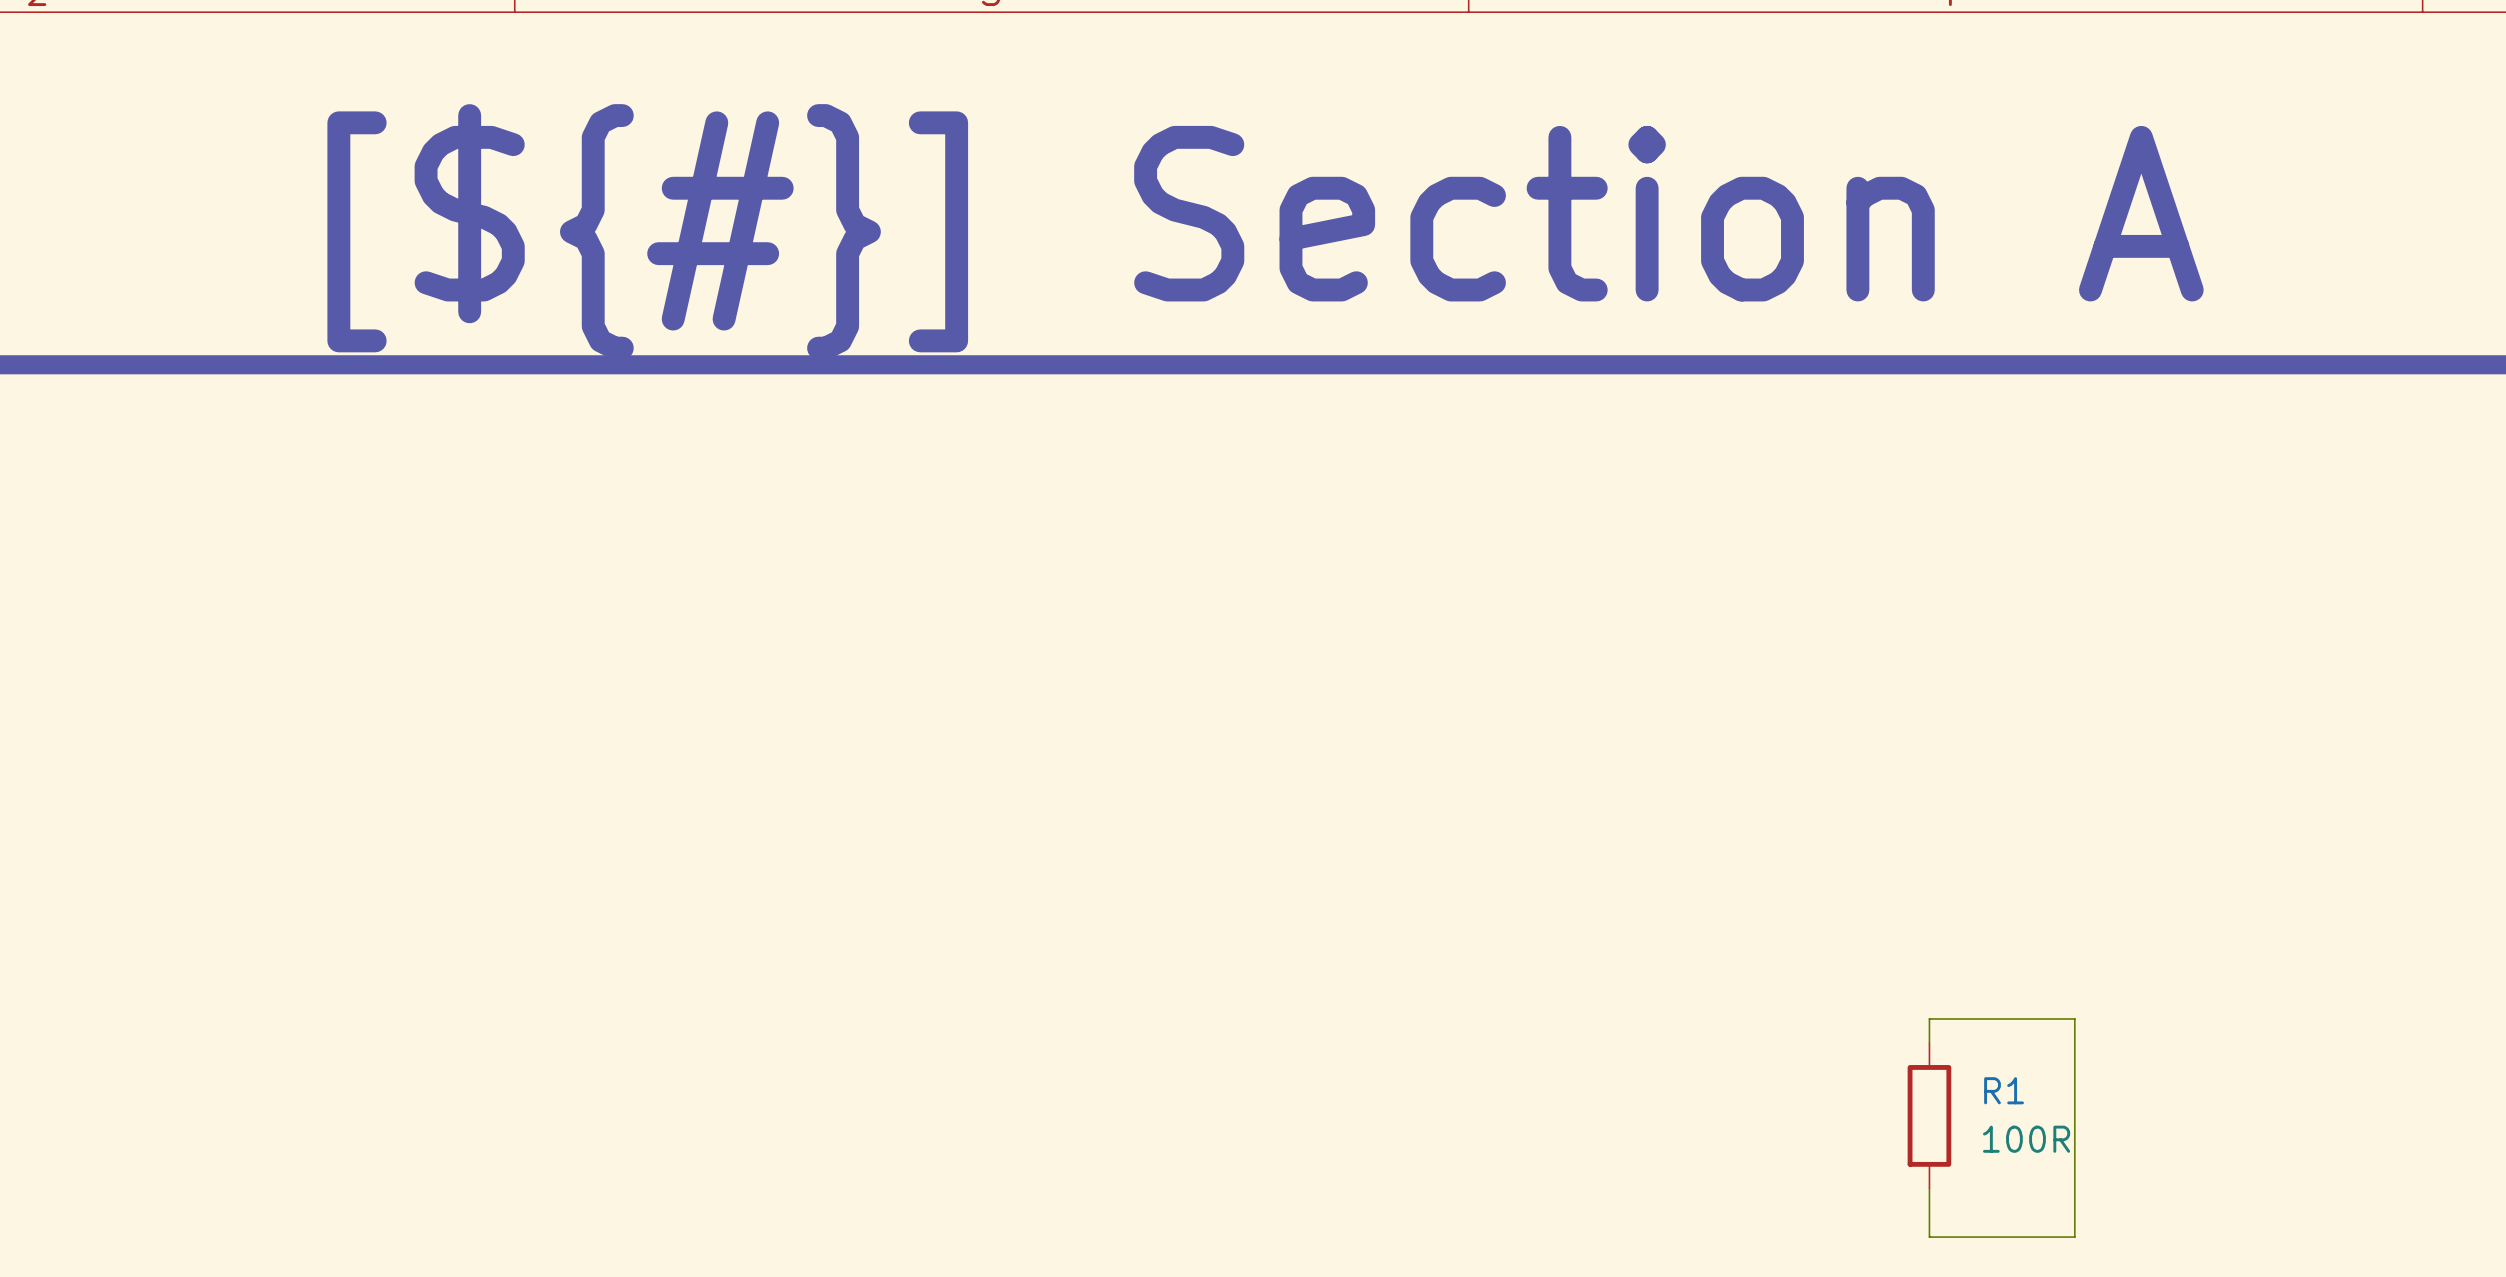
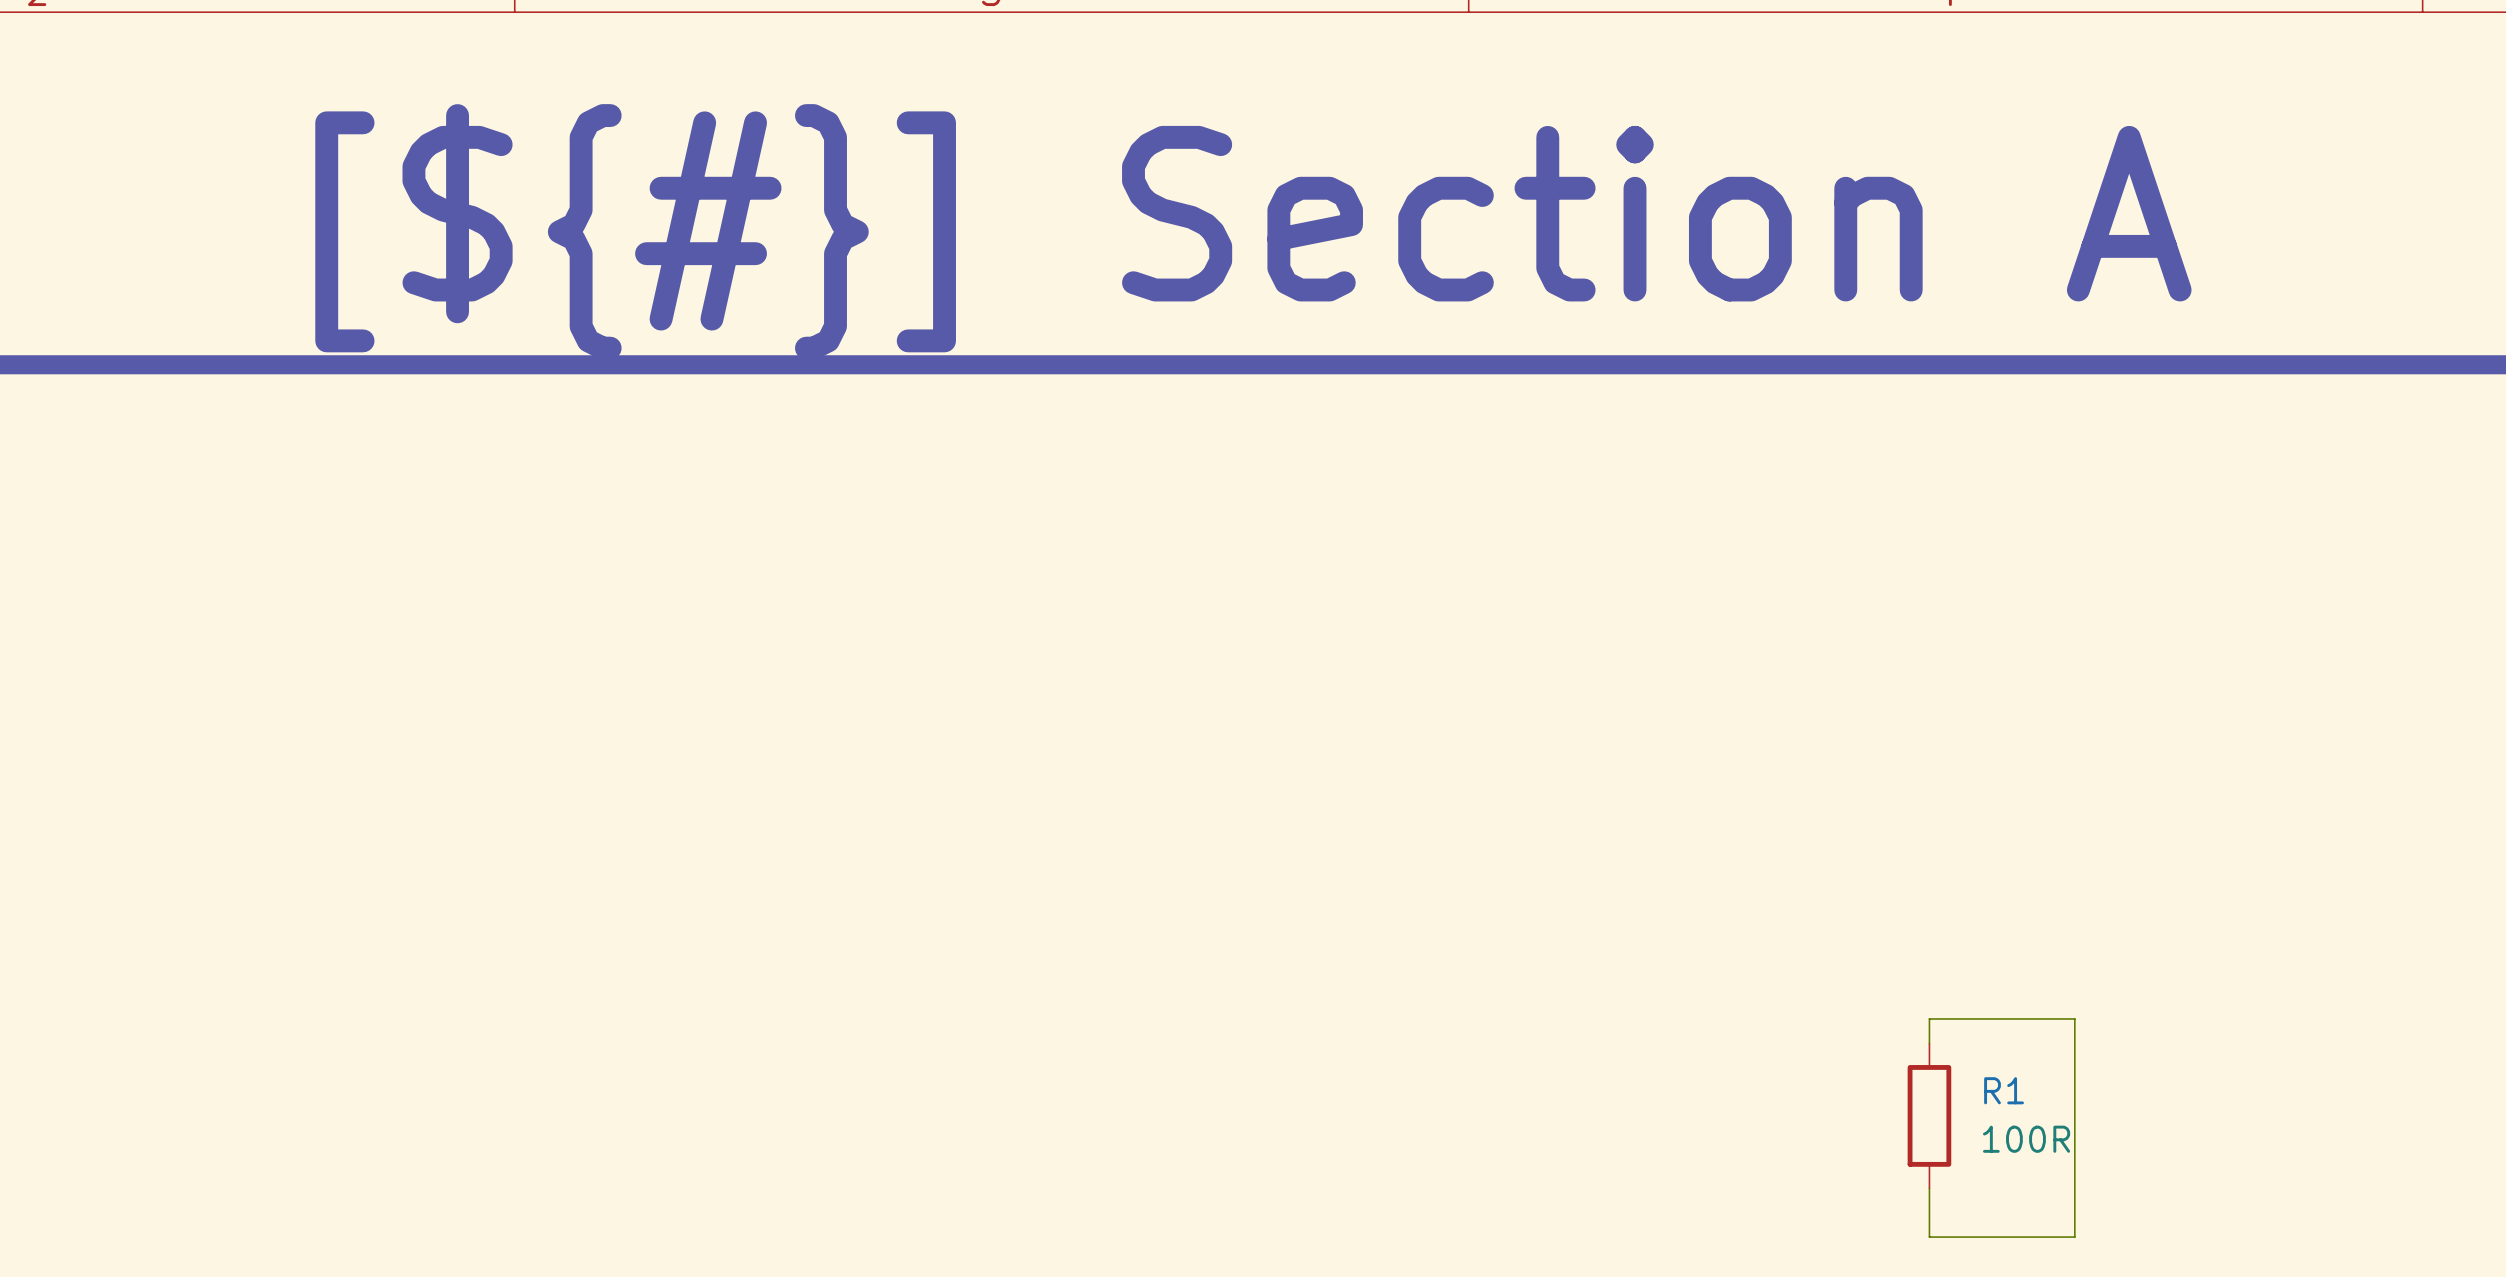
text position: [${#}] Section A (1265, 231) -> [${#}] Section A (1253, 231)

